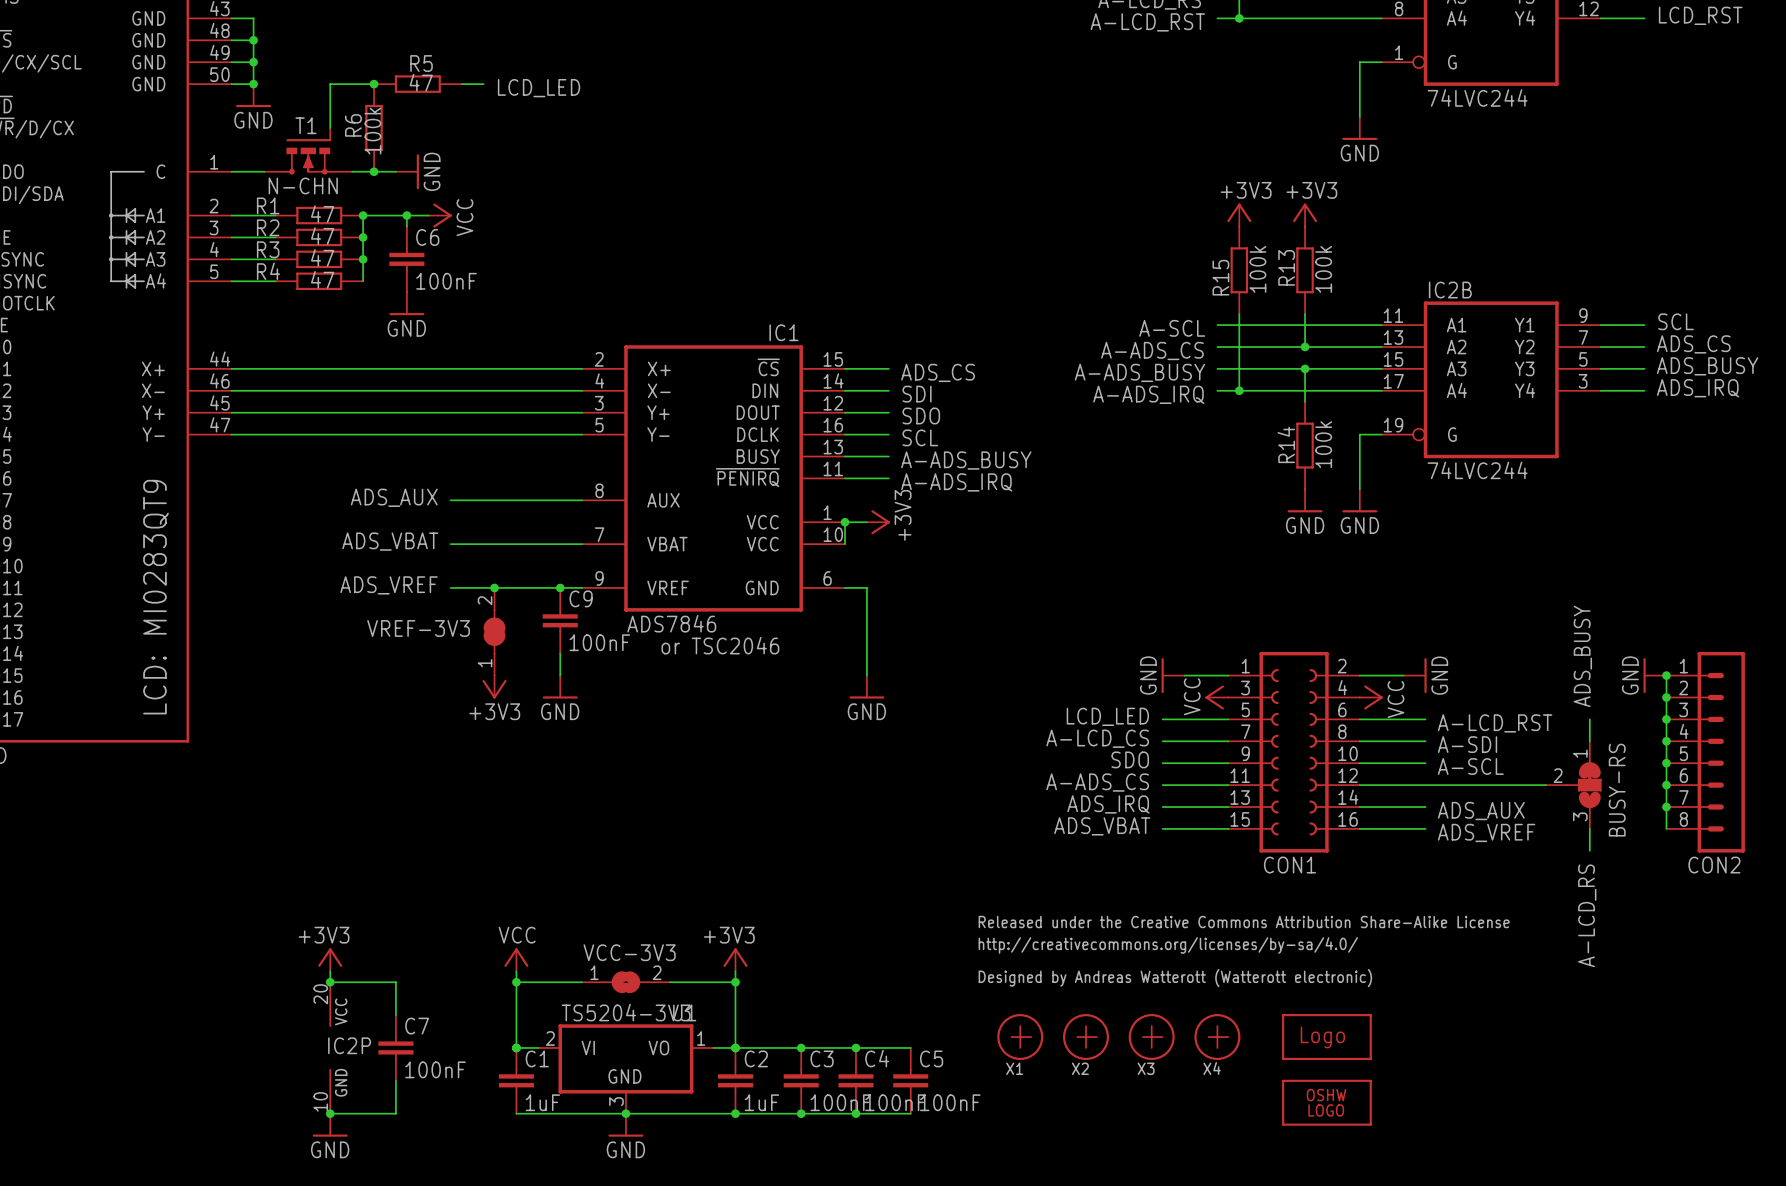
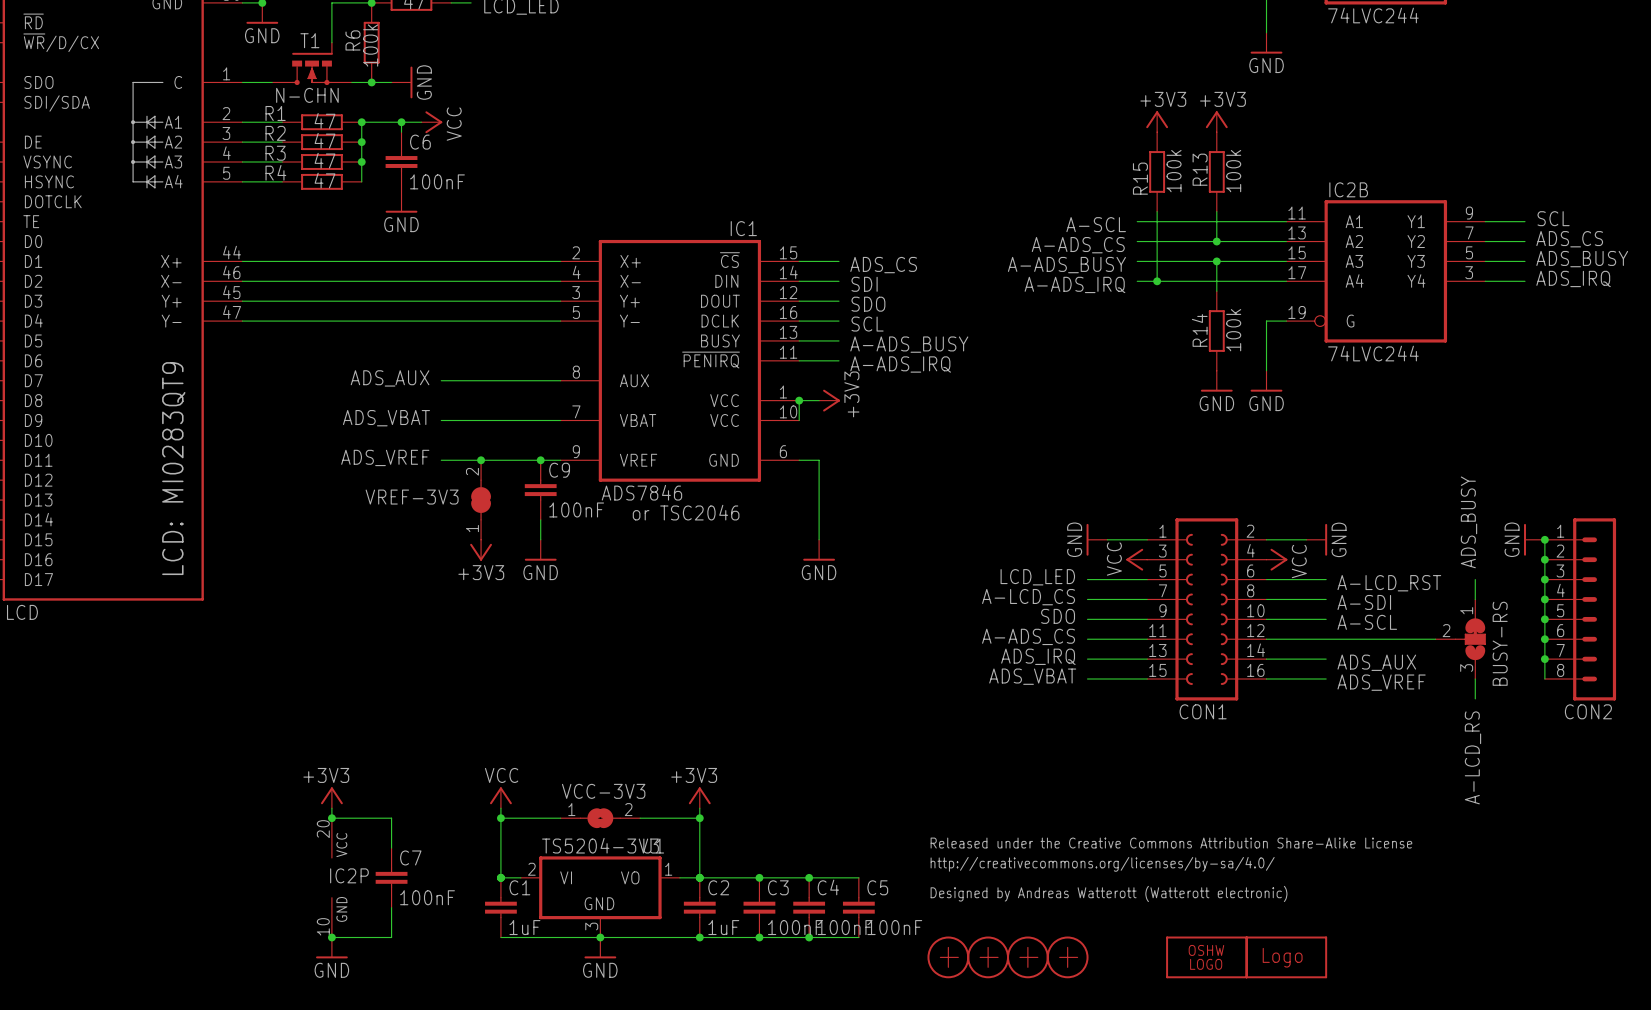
text position: Released under the Creative Commons Attribution Share-Alike License (1244, 922) -> Released under the Creative Commons Attribution Share-Alike License (1171, 843)
text position: http://creativecommons.org/licenses/by-sa/4.0/ (1168, 945) -> http://creativecommons.org/licenses/by-sa/4.0/ (1102, 864)
text position: Designed by Andreas Watterott (Watterott electronic) (1175, 978) -> Designed by Andreas Watterott (Watterott electronic) (1109, 893)
X1: (1020, 1037) -> none
X2: (1085, 1037) -> none
X3: (1151, 1037) -> none
X4: (1217, 1037) -> none
part position: (1326, 1037) -> (1286, 957)
part position: (1326, 1102) -> (1206, 957)
part: none -> (948, 957)
part: none -> (988, 957)
part: none -> (1027, 957)
part: none -> (1067, 957)

